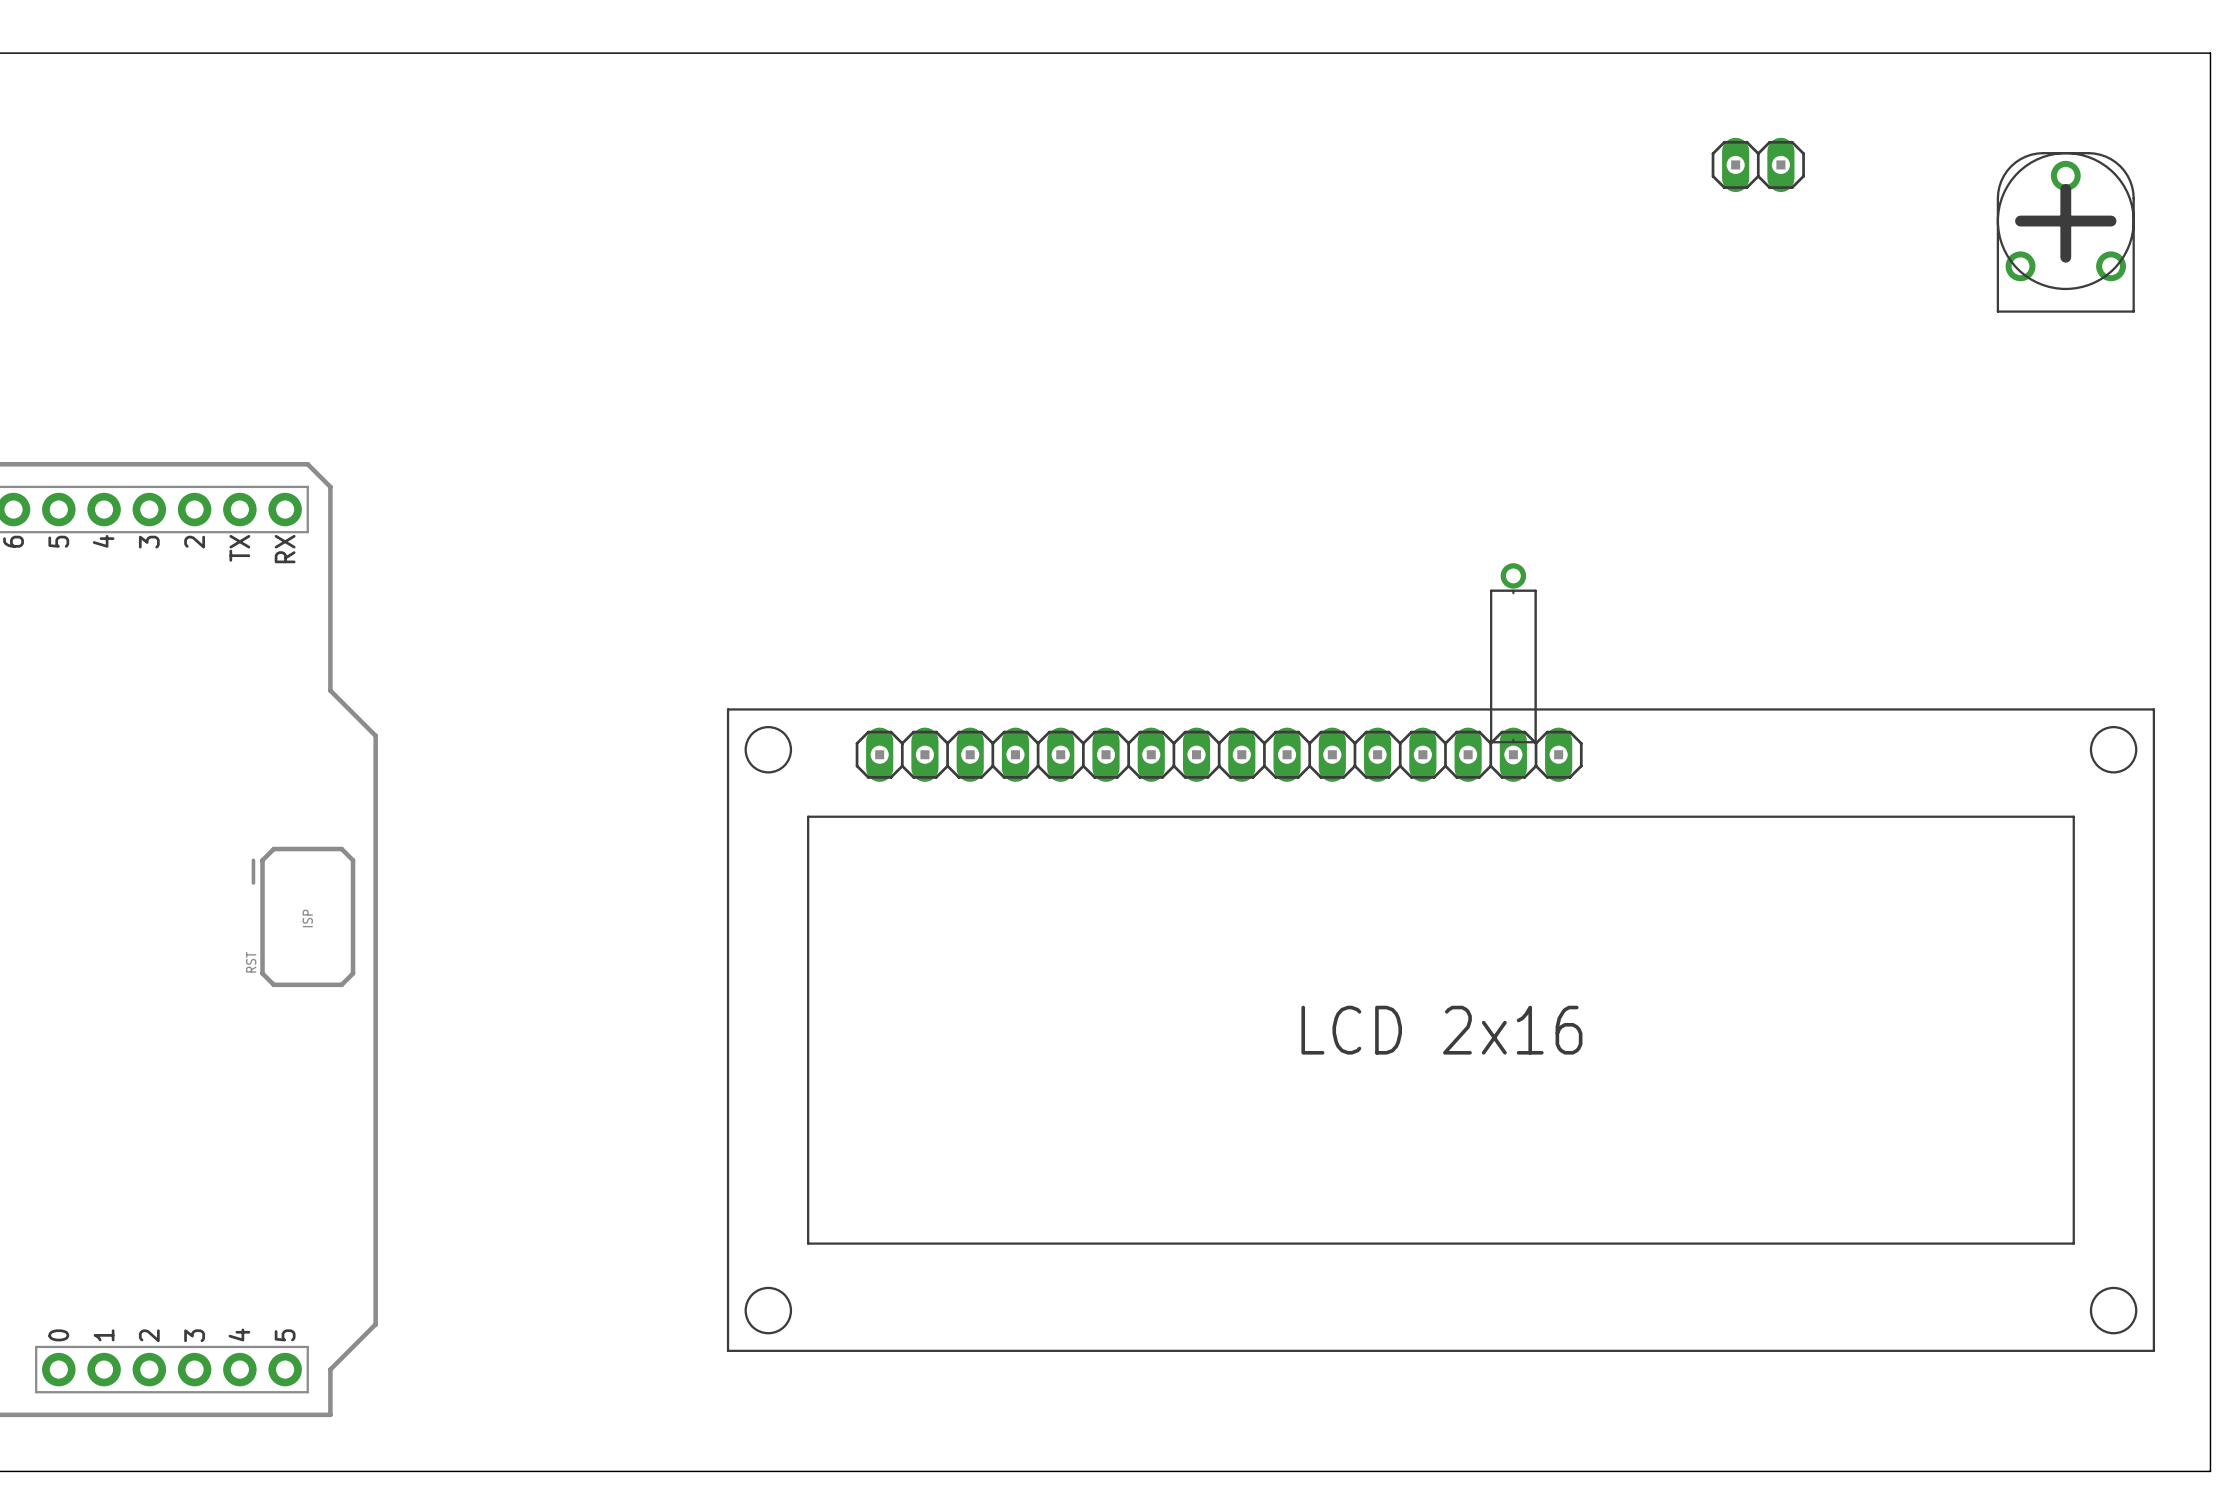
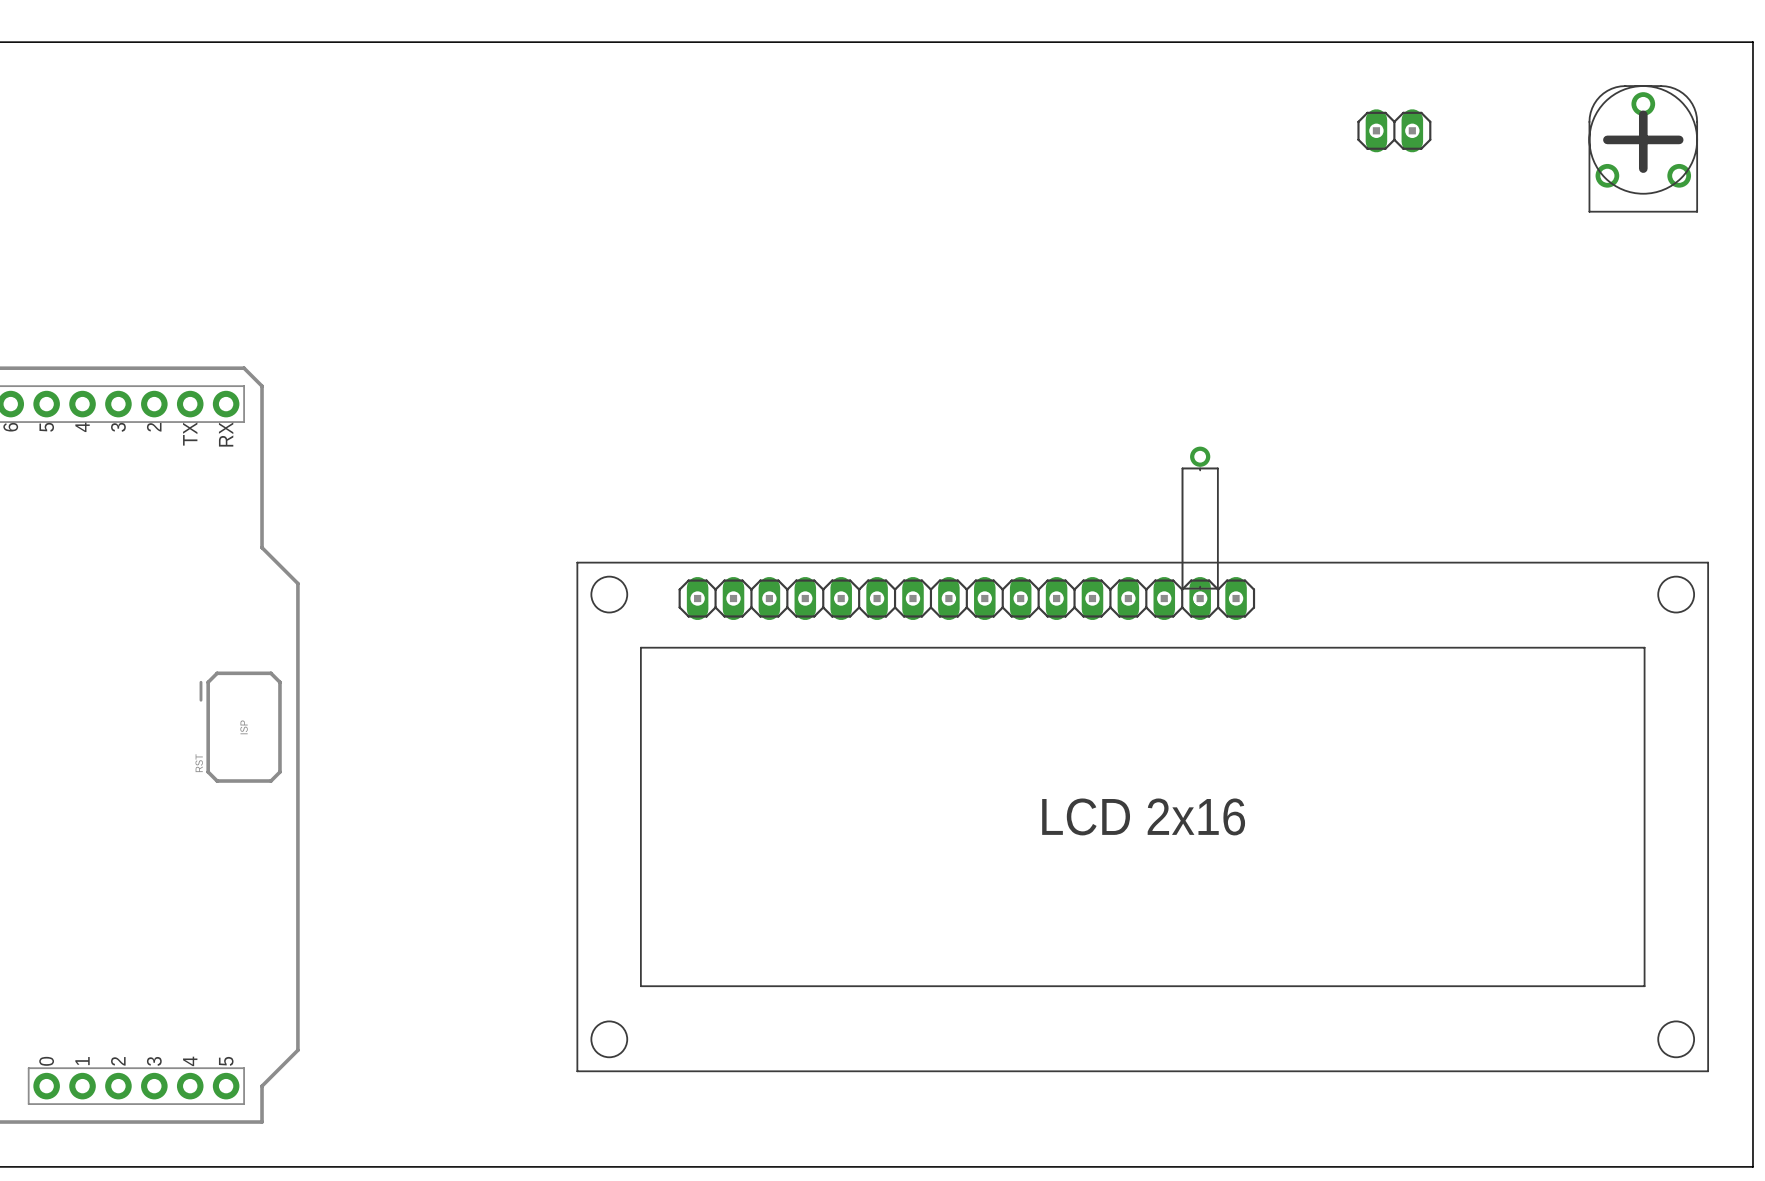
part position: (2065, 232) -> (1643, 148)

